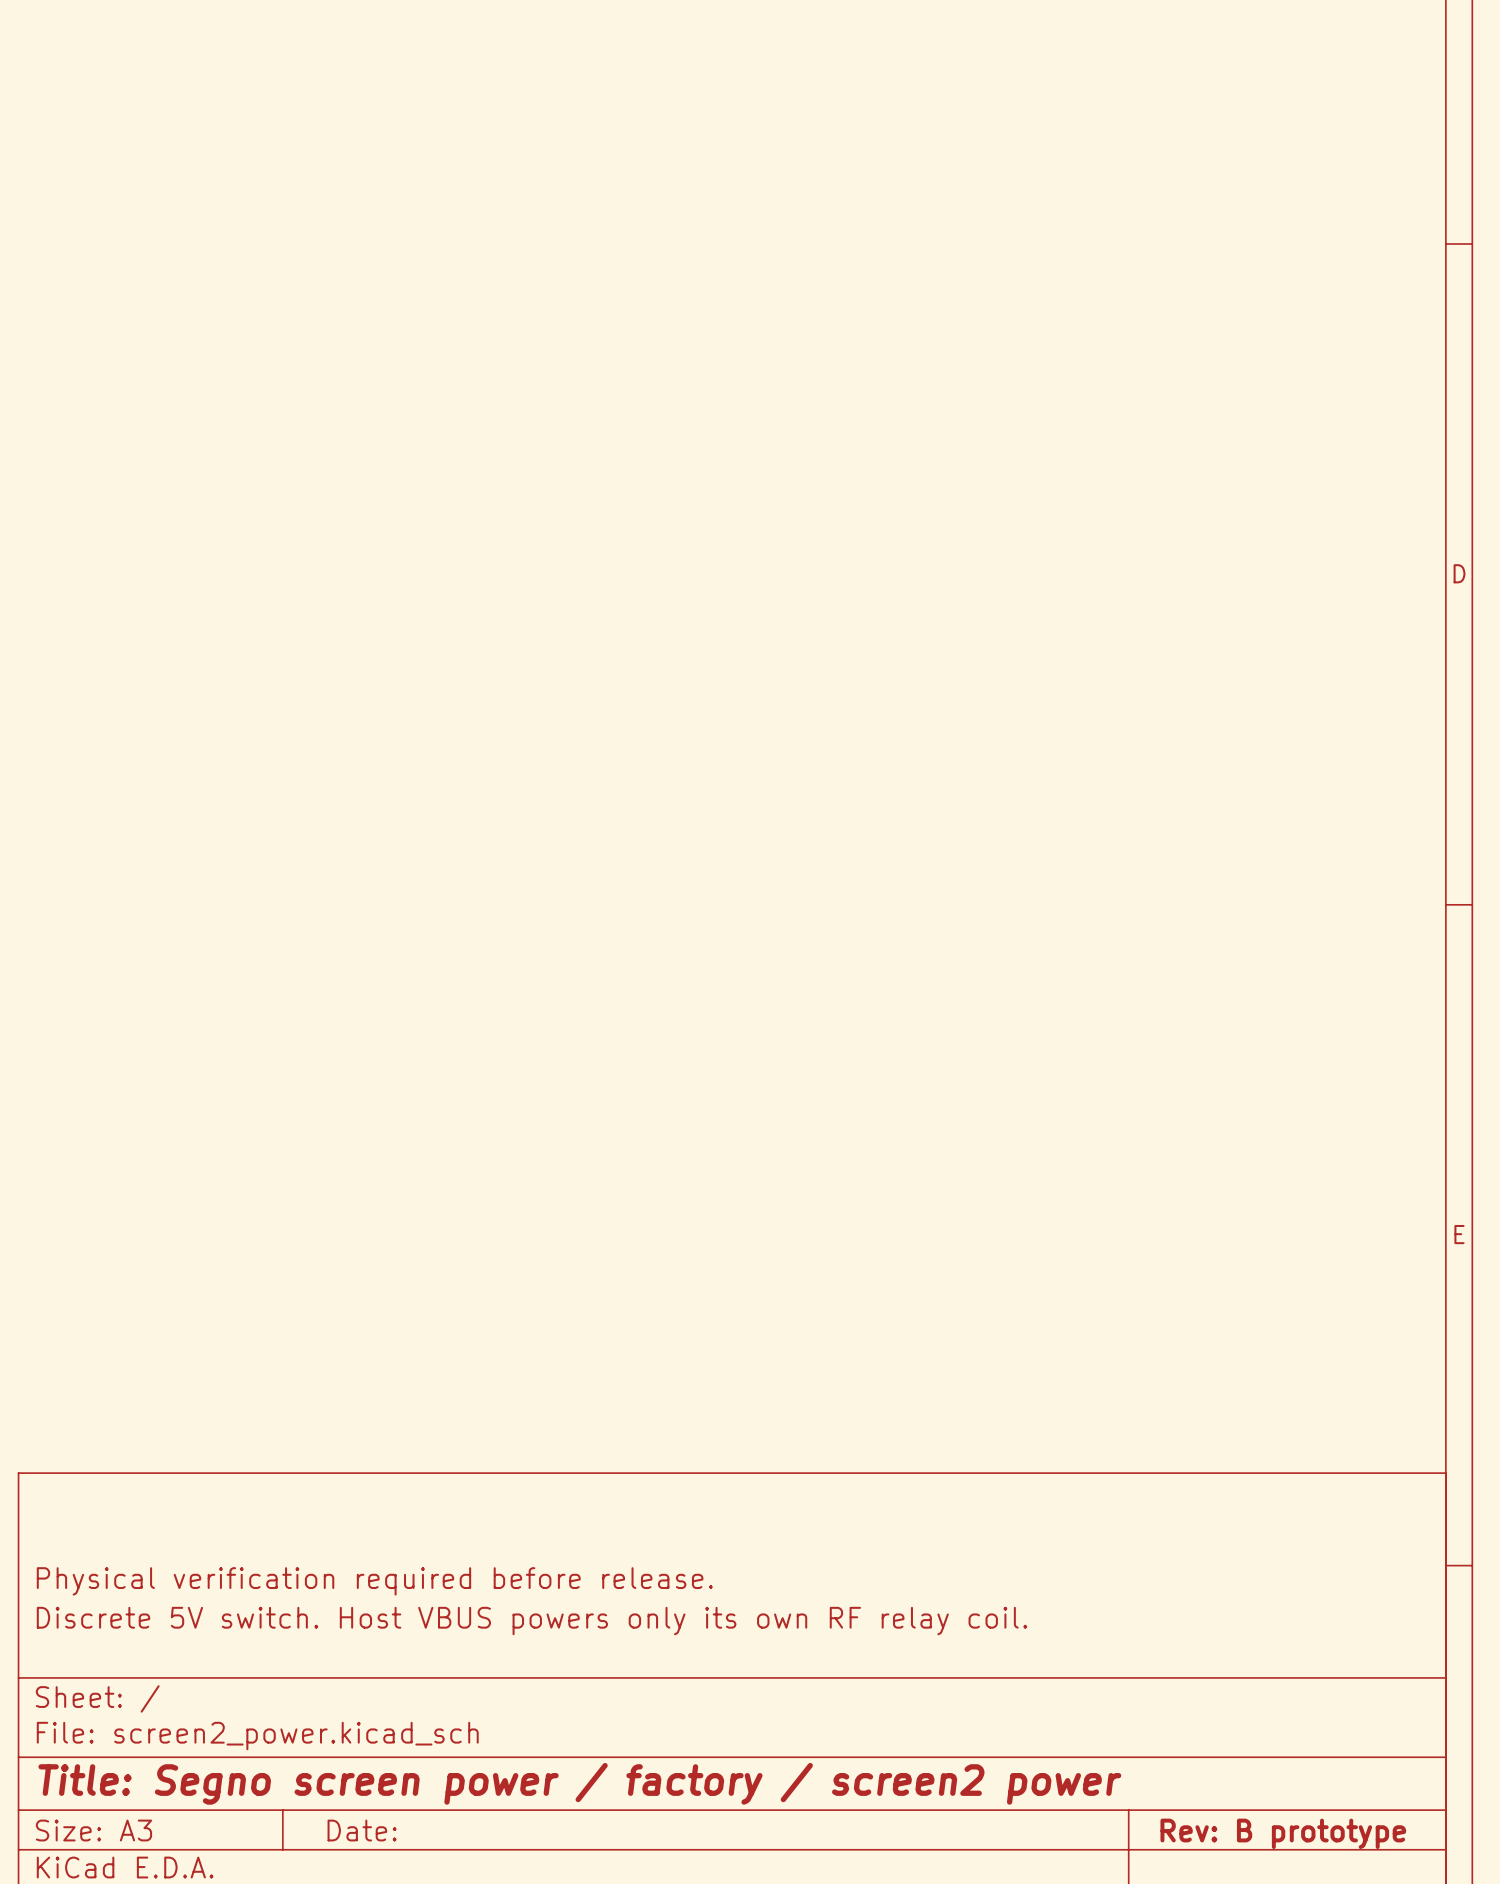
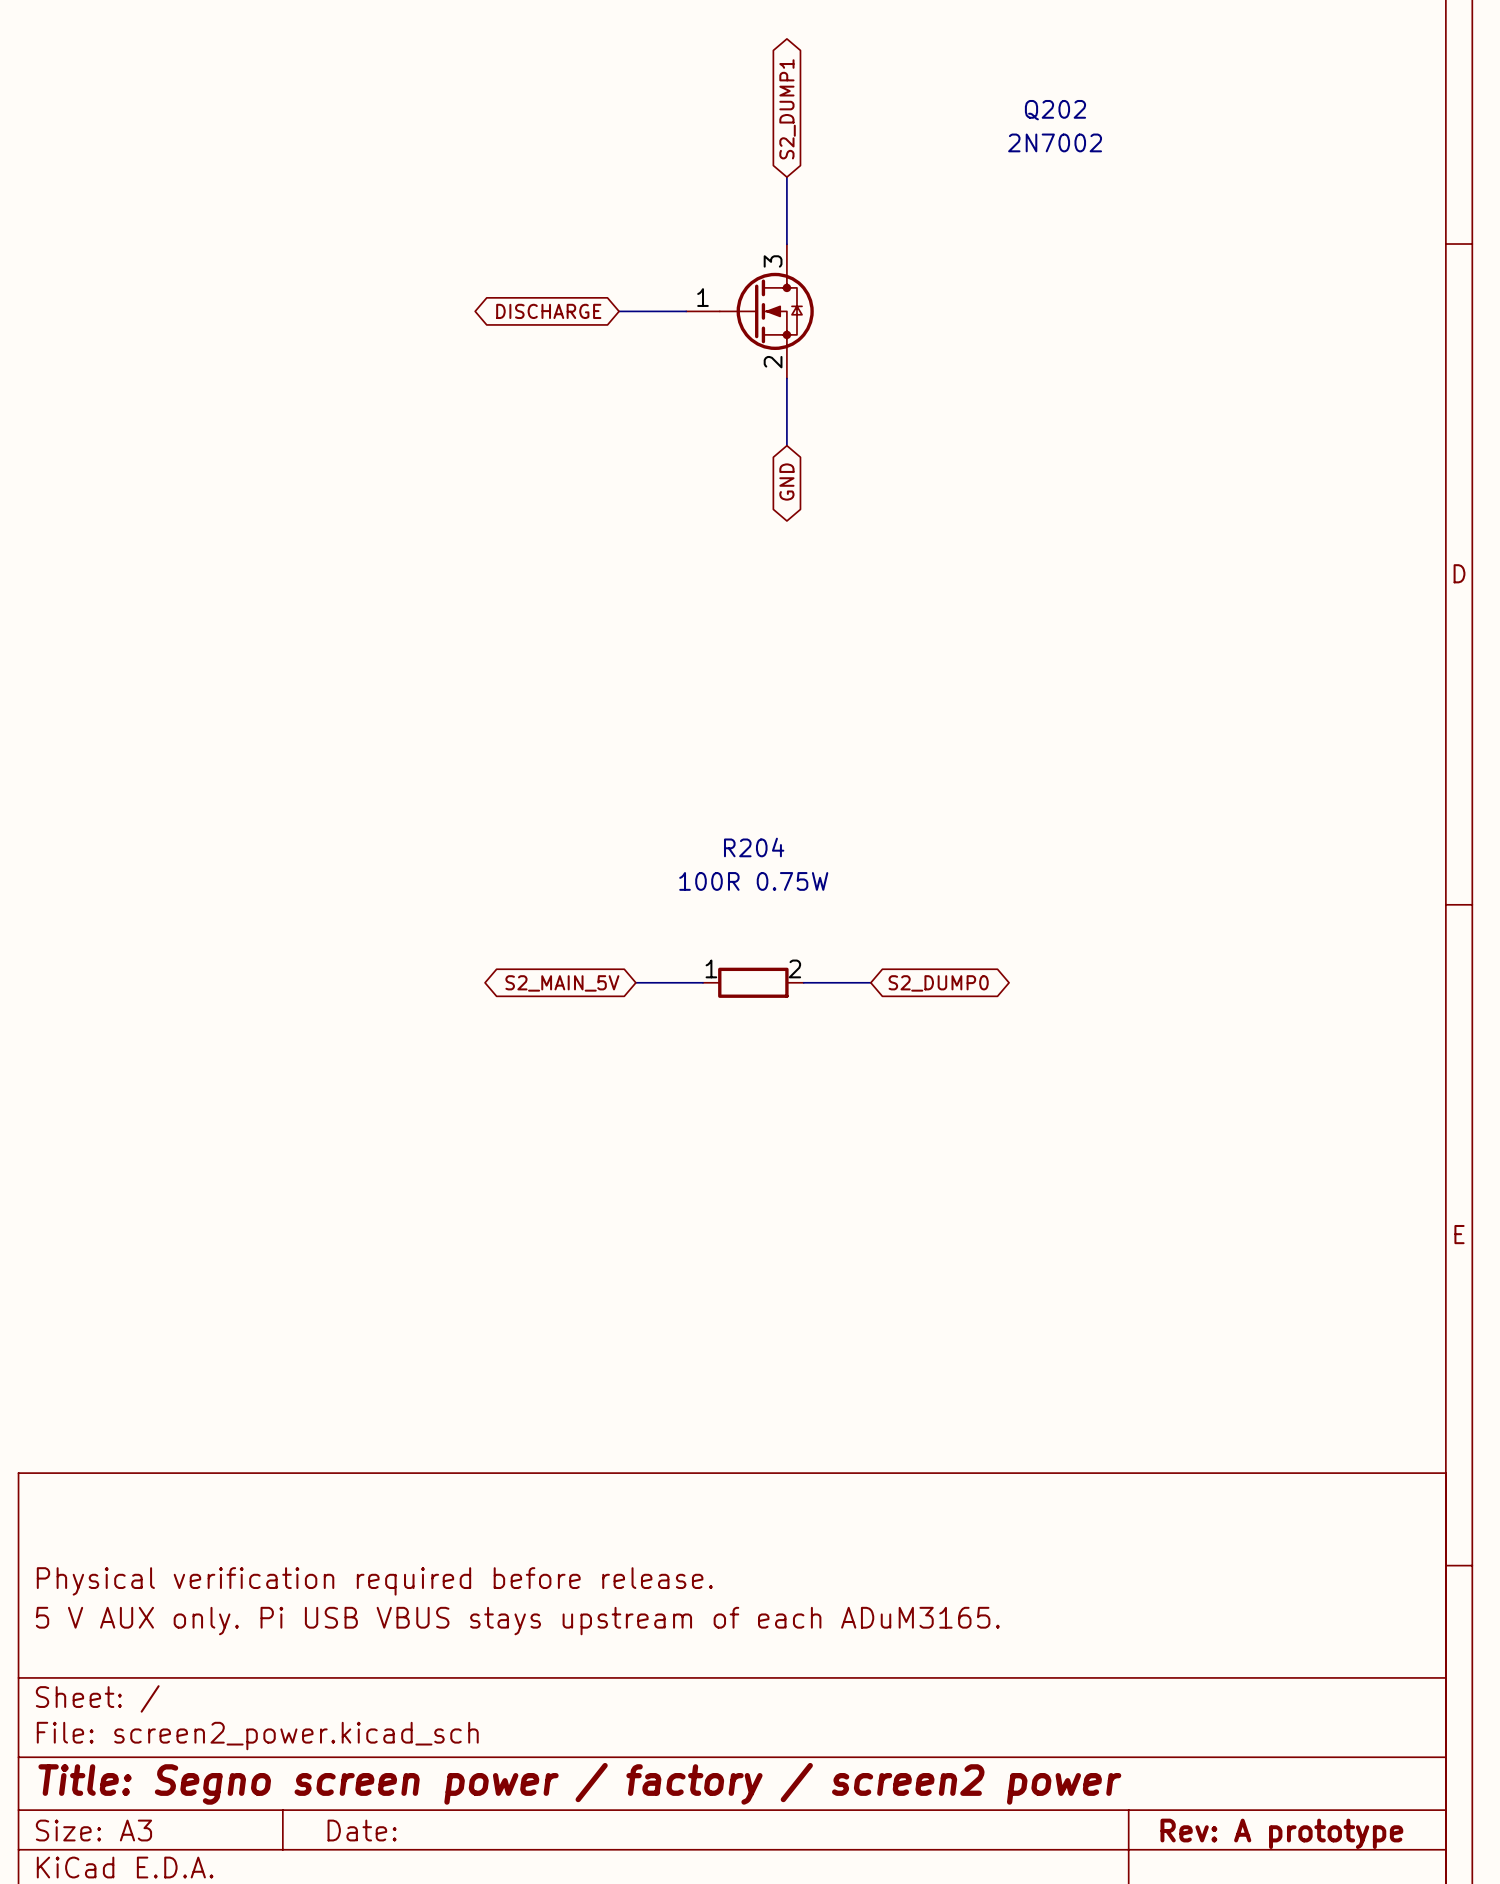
global label: none -> S2_DUMP1 (787, 109)
wire: none -> (786, 177) (786, 244)
global label: none -> DISCHARGE (548, 311)
wire: none -> (619, 311) (686, 311)
Q202: none -> 2N7002 (749, 311)
wire: none -> (786, 378) (786, 445)
global label: none -> GND (786, 482)
wire: none -> (635, 982) (703, 982)
R204: none -> 100R 0.75W (753, 982)
wire: none -> (803, 982) (870, 982)
global label: none -> S2_MAIN_5V (562, 983)
global label: none -> S2_DUMP0 (938, 983)
title block: Discrete 5V switch. Host VBUS powers only its own RF relay coil. (531, 1621) -> 5 V AUX only. Pi USB VBUS stays upstream of each ADuM3165. (517, 1621)
title block: Rev: B prototype (1283, 1833) -> Rev: A prototype (1281, 1833)

